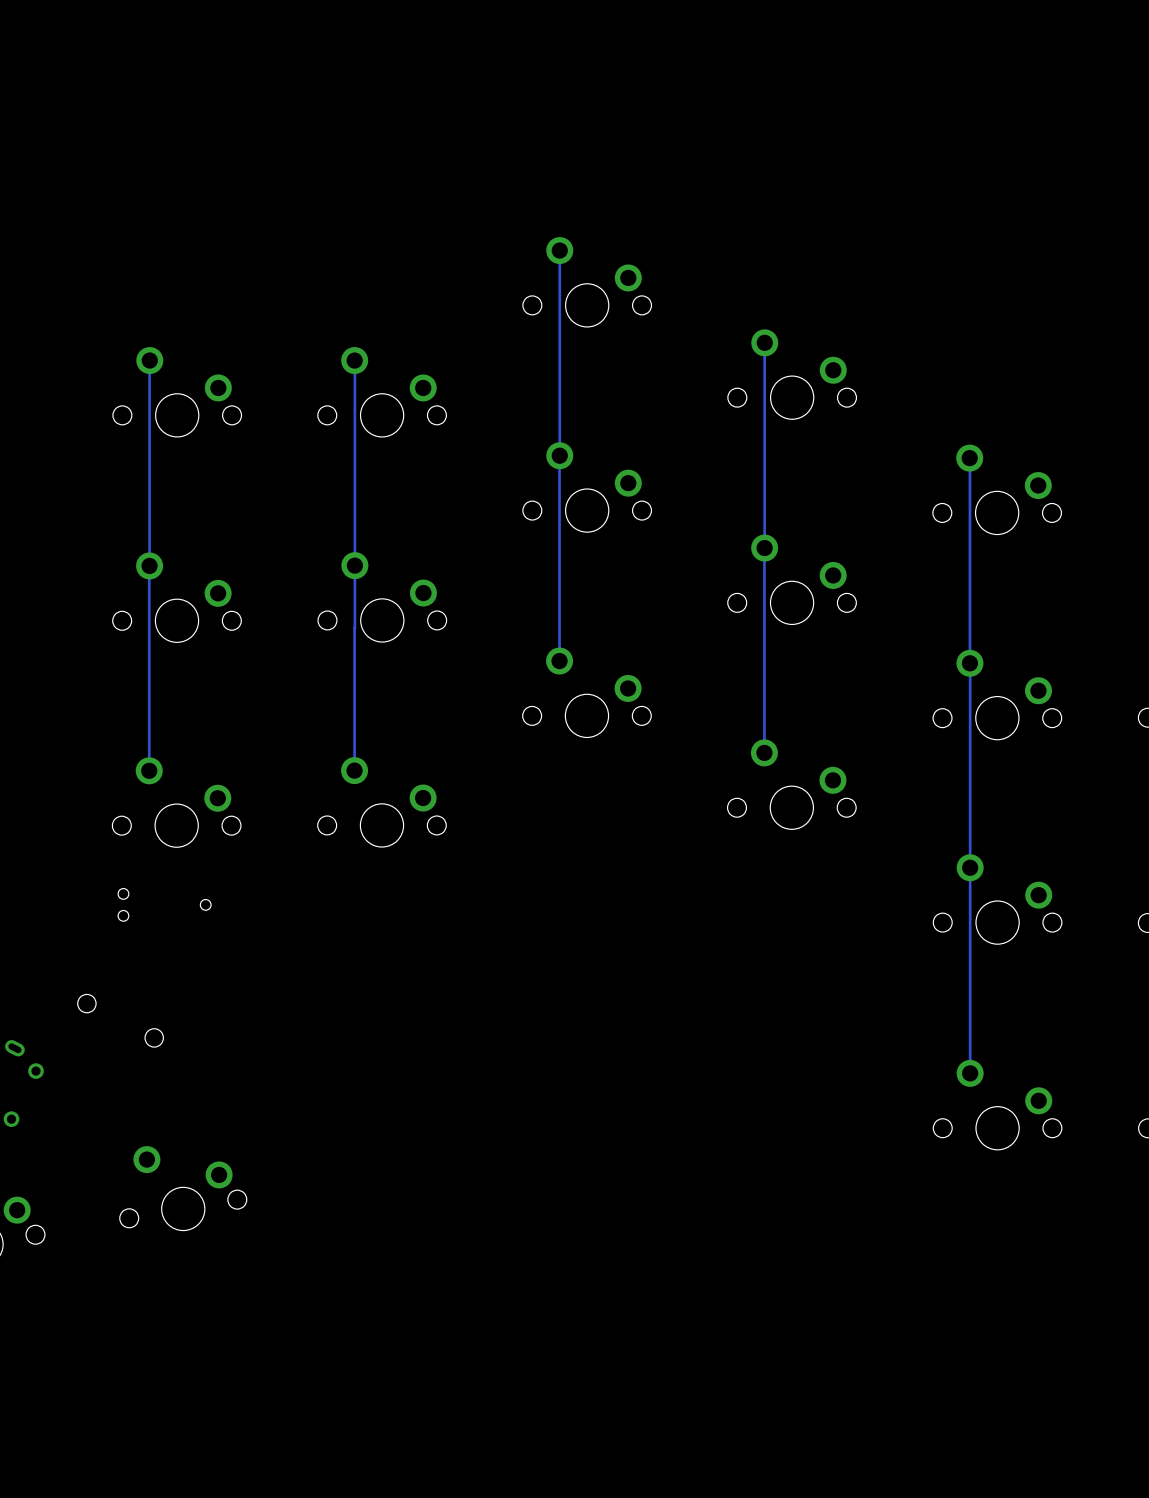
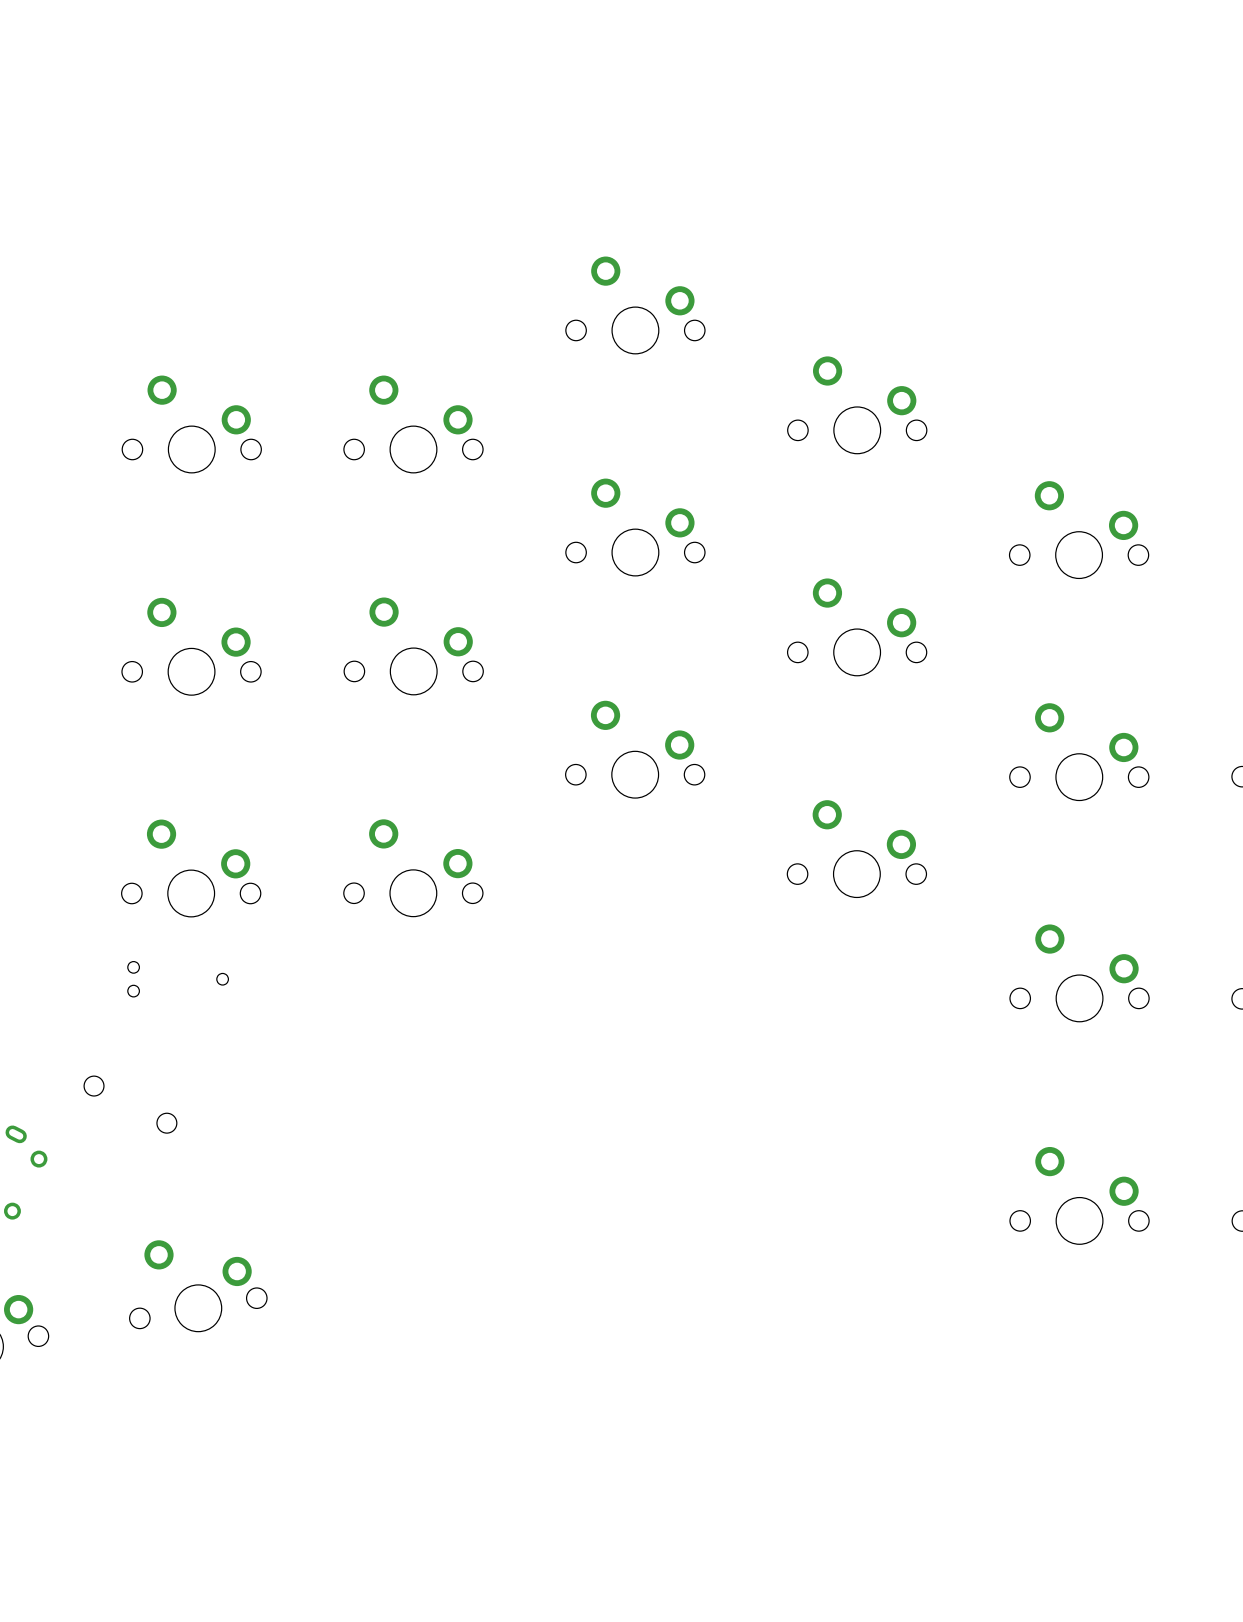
track: (559, 250) (559, 661) -> none
track: (764, 342) (764, 752) -> none
track: (149, 360) (149, 770) -> none
track: (354, 360) (354, 770) -> none
track: (969, 458) (970, 1073) -> none

